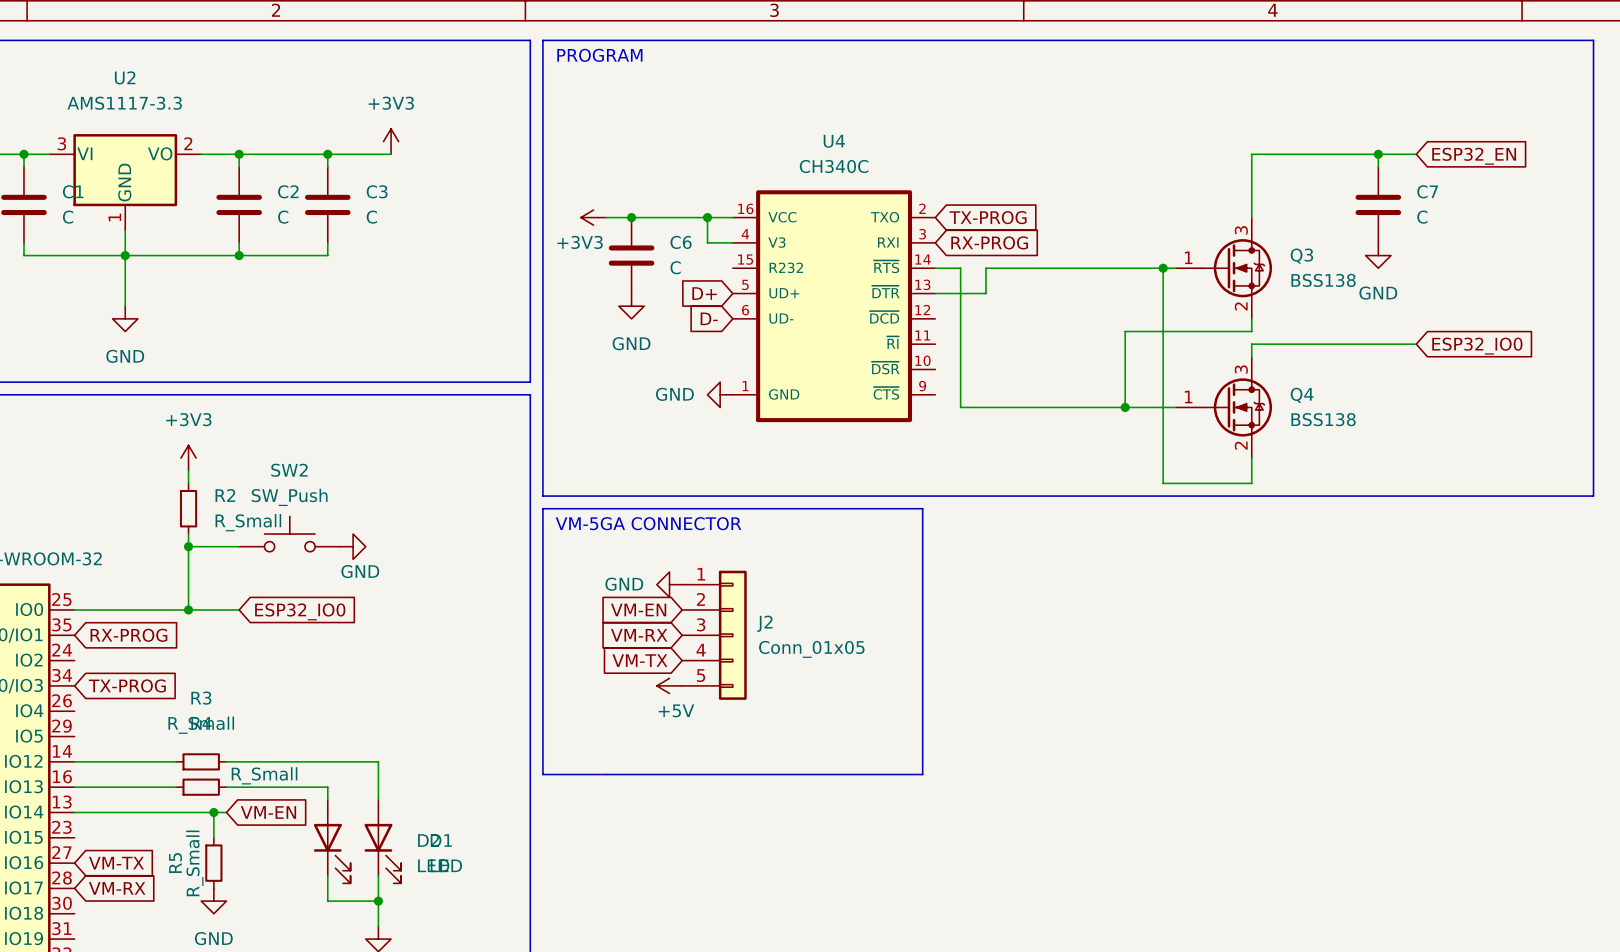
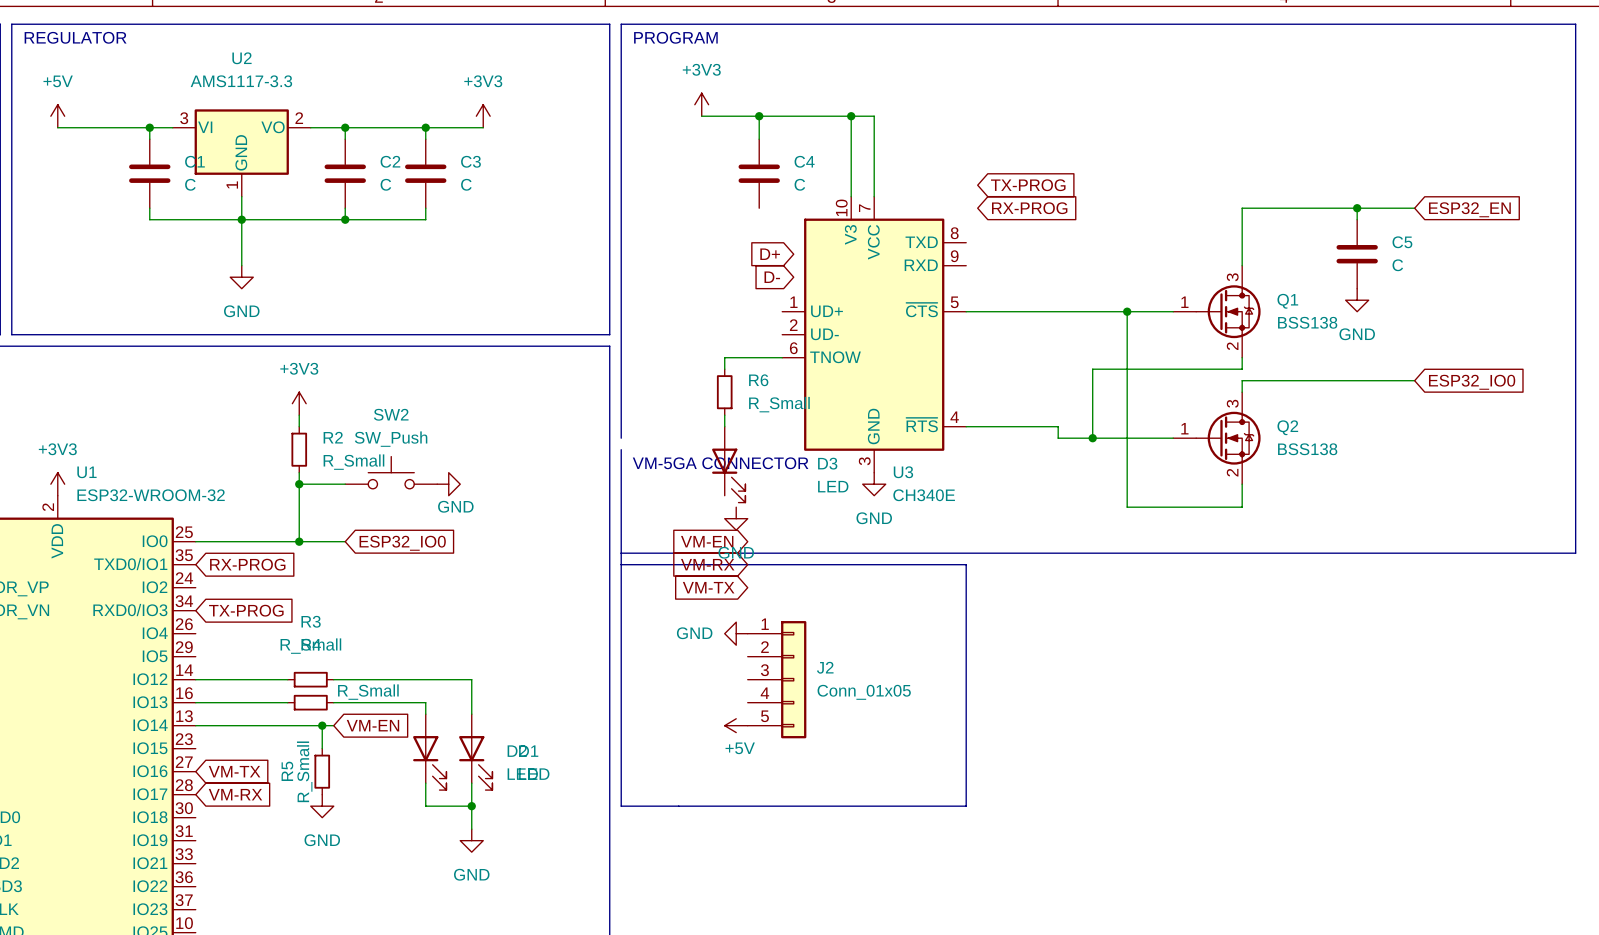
wire: none -> (701, 116) (874, 116) (874, 196)
wire: none -> (759, 116) (759, 139)
junction: none -> (759, 116)
wire: none -> (851, 116) (851, 196)
junction: none -> (851, 116)
wire: (1378, 154) (1378, 166) -> (1357, 208) (1357, 219)
junction: (1378, 154) -> none
wire: (1416, 154) (1251, 154) (1251, 217) -> none
global label position: ESP32_EN (1474, 156) -> ESP32_EN (1469, 209)
C4: none -> C (759, 173)
C7: C (1378, 204) -> none
power symbol rotation: 0° (593, 217) -> 90° clockwise (701, 104)
power symbol position: +3V3 (593, 217) -> +3V3 (701, 104)
wire: (606, 217) (732, 217) -> none
junction: (631, 217) -> none
wire: (707, 217) (707, 242) (732, 242) -> none
junction: (707, 217) -> none
power symbol text position: +3V3 (580, 242) -> +3V3 (701, 69)
junction: none -> (1357, 208)
wire: none -> (1414, 208) (1242, 208) (1242, 265)
C6: C (631, 255) -> none
power symbol position: GND (1378, 255) -> GND (1357, 300)
wire: (935, 268) (960, 268) (960, 407) (1175, 407) -> none
wire: (1163, 268) (1163, 483) (1251, 483) (1251, 458) -> none
junction: (1163, 268) -> none
wire: (1175, 268) (985, 268) (985, 293) (935, 293) -> none
Q3: BSS138 (1223, 268) -> none
C5: none -> C (1357, 254)
power symbol: GND (631, 306) -> none
U4: CH340C (834, 306) -> none
wire: (1251, 318) (1251, 331) (1125, 331) (1125, 407) -> none
wire: (1416, 344) (1251, 344) (1251, 356) -> none
global label position: ESP32_IO0 (1477, 346) -> ESP32_IO0 (1472, 382)
wire: none -> (966, 311) (1173, 311)
wire: none -> (1127, 311) (1127, 507) (1242, 507) (1242, 484)
junction: none -> (1127, 311)
Q1: none -> BSS138 (1216, 311)
U3: none -> CH340E (874, 334)
power symbol: GND (720, 394) -> none
wire: none -> (782, 357) (724, 357) (724, 369)
junction: (1125, 407) -> none
Q4: BSS138 (1223, 407) -> none
wire: none -> (1242, 357) (1242, 369) (1092, 369) (1092, 438)
wire: none -> (1414, 380) (1242, 380) (1242, 392)
R6: none -> R_Small (724, 392)
wire: none -> (724, 415) (724, 426)
wire: none -> (966, 426) (1058, 426) (1058, 438) (1173, 438)
line: (542, 496) (1593, 496) -> (621, 553) (1575, 553) (1575, 438)
junction: none -> (1092, 438)
Q2: none -> BSS138 (1216, 438)
line: (542, 508) (922, 508) (922, 635) -> (621, 564) (966, 564)
D3: none -> LED (728, 464)
power symbol: none -> GND (874, 484)
power symbol rotation: 0° (669, 584) -> 90° counterclockwise (736, 518)
J2 position: (714, 635) -> (777, 679)
power symbol position: +5V (669, 685) -> +5V (736, 725)
power symbol: none -> GND (736, 633)
line: (542, 774) (922, 774) -> (621, 691) (621, 806) (966, 806) (966, 691)

